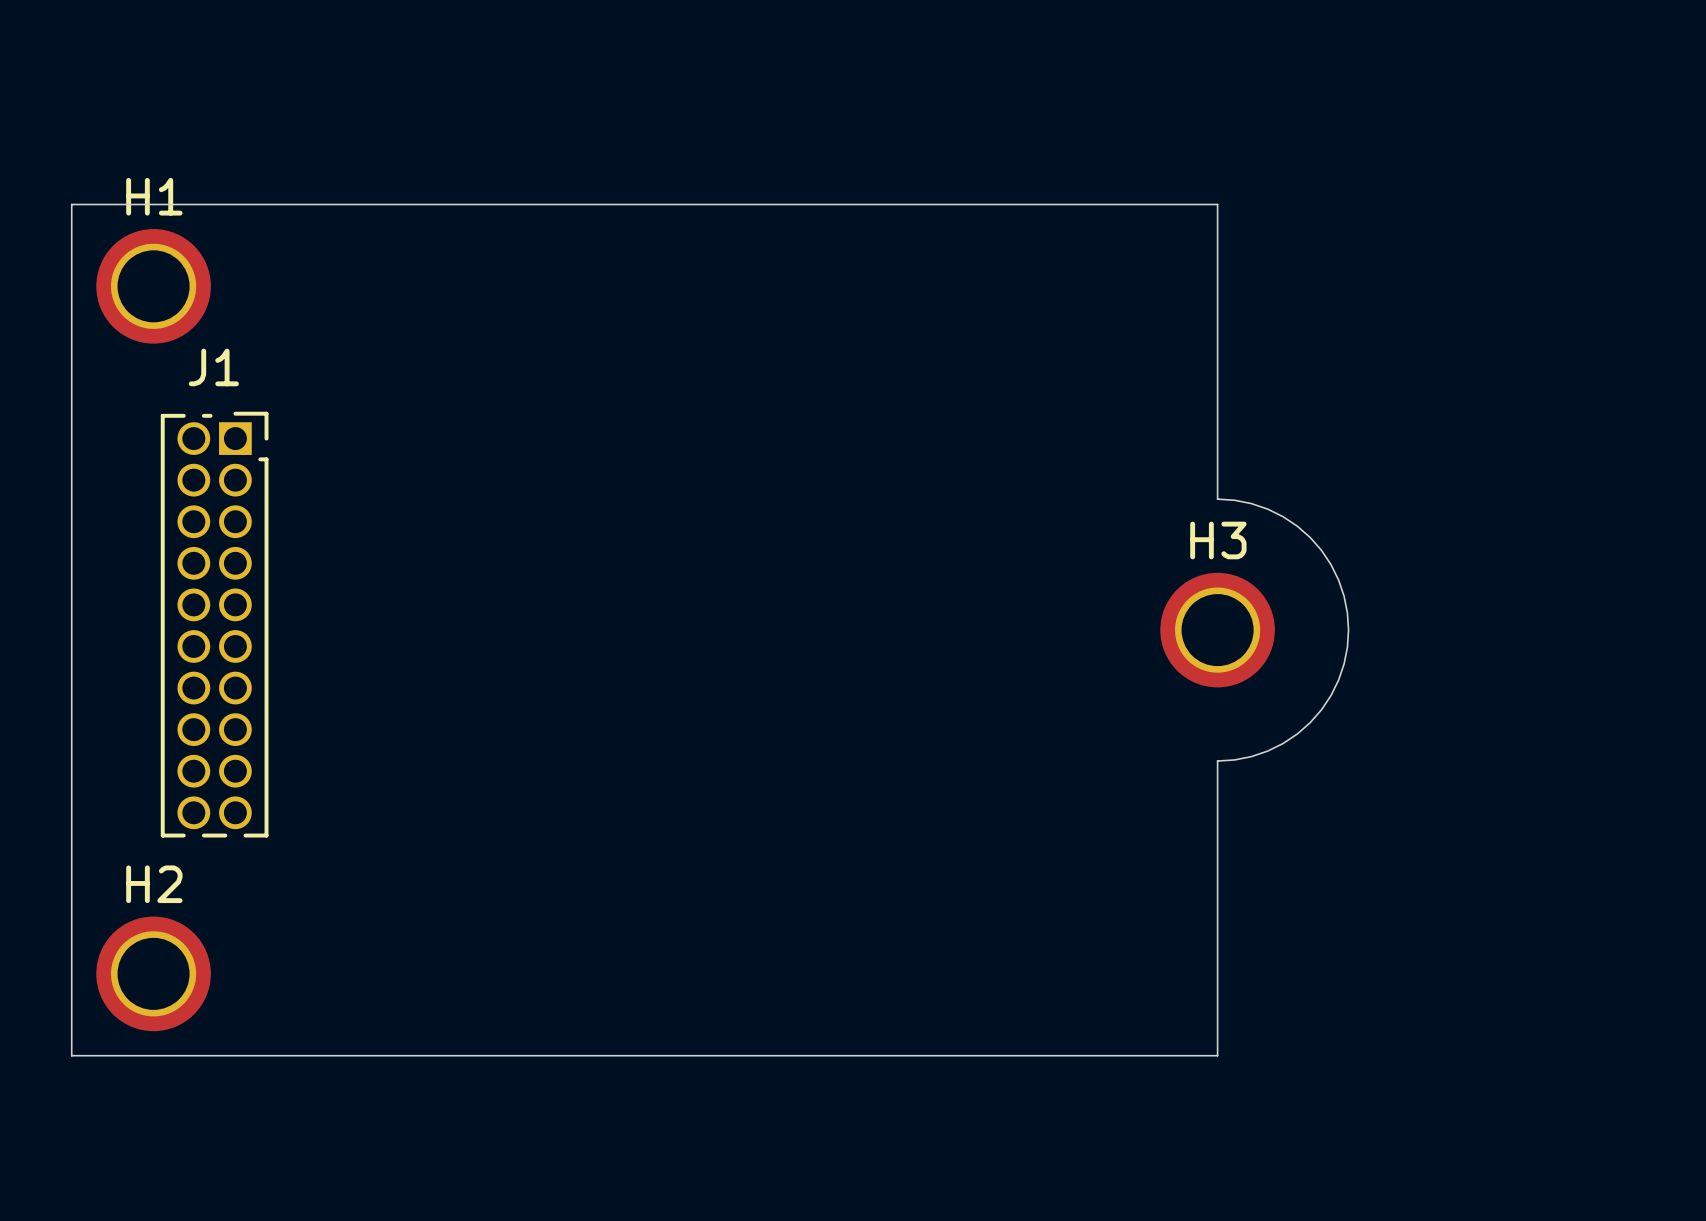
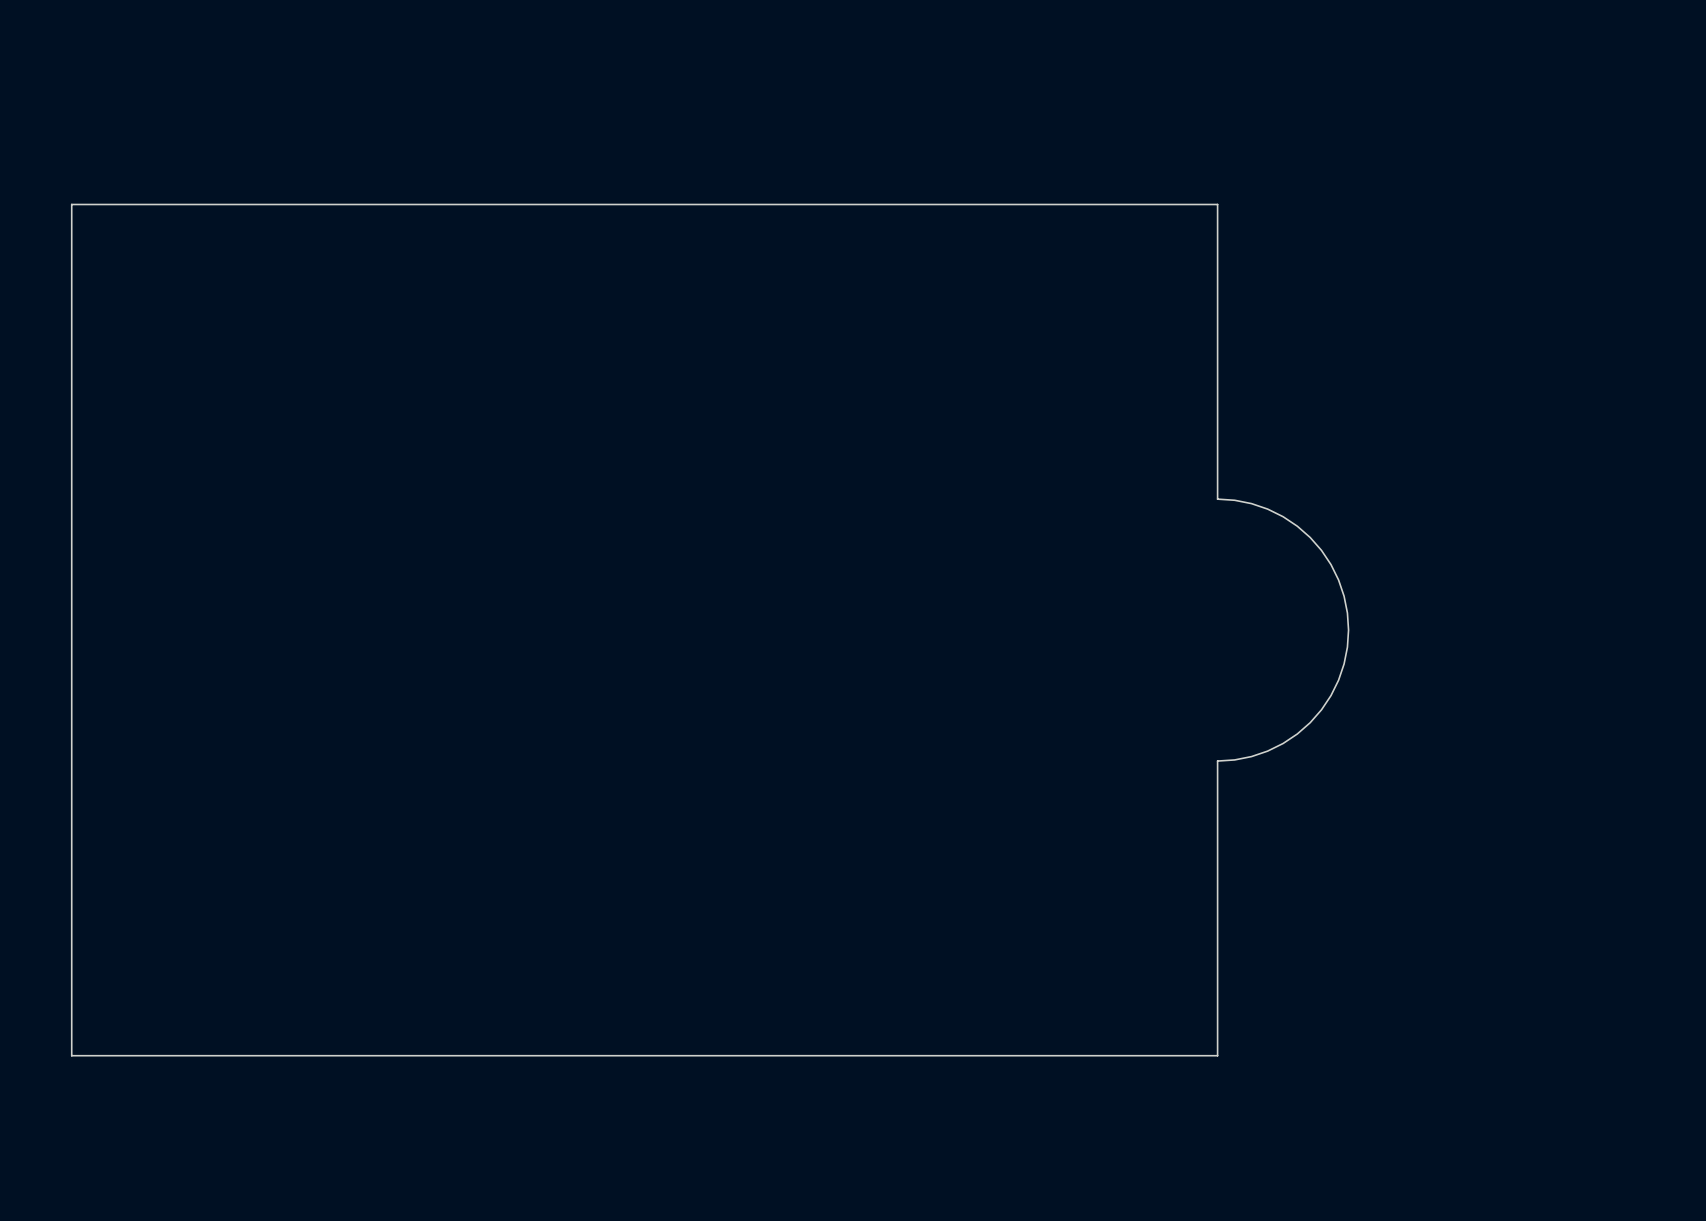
H1: (153, 286) -> none
J1: (214, 624) -> none
H3: (1217, 630) -> none
H2: (153, 973) -> none

